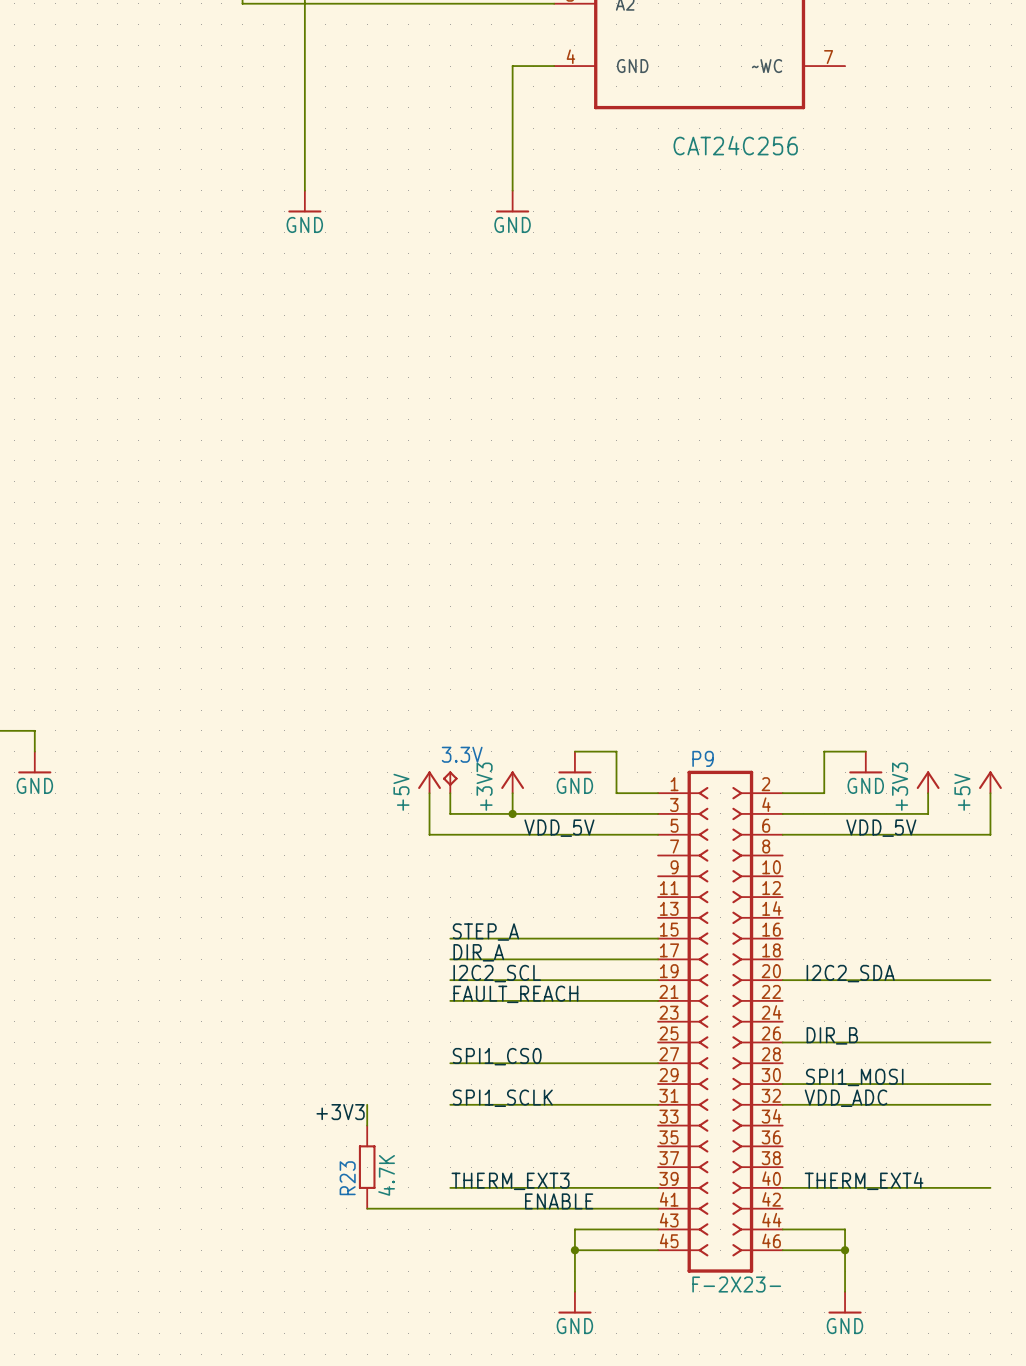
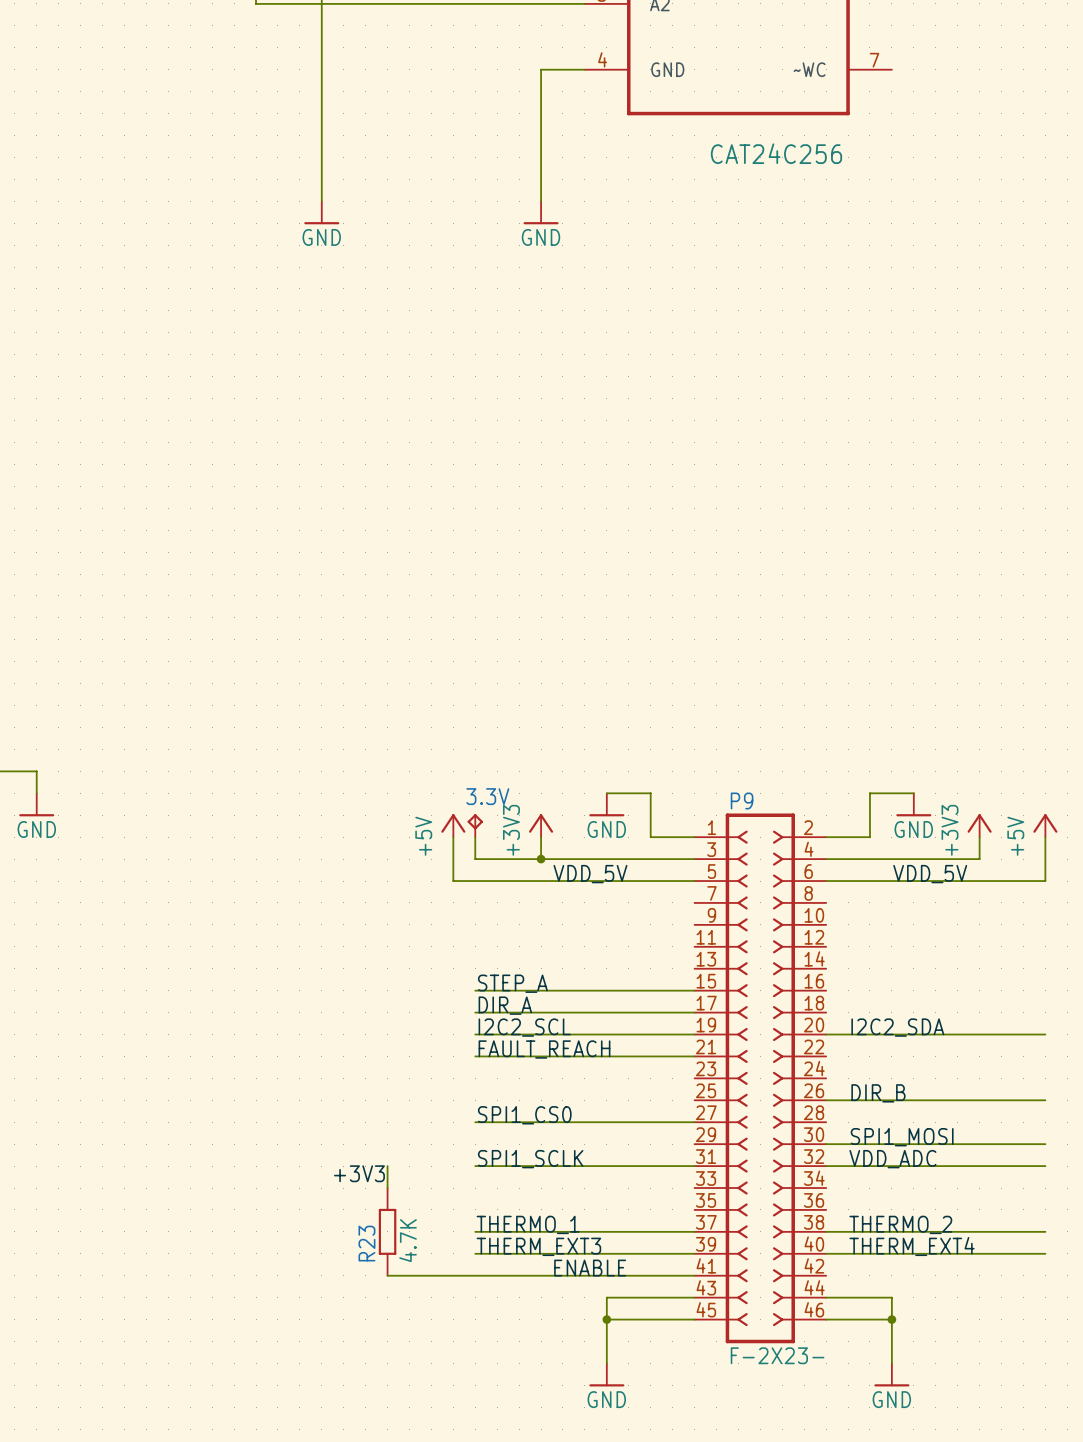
label: none -> THERMO_1 (528, 1224)
label: none -> THERMO_2 (900, 1224)
wire: none -> (475, 1231) (694, 1231)
wire: none -> (826, 1231) (1045, 1231)

